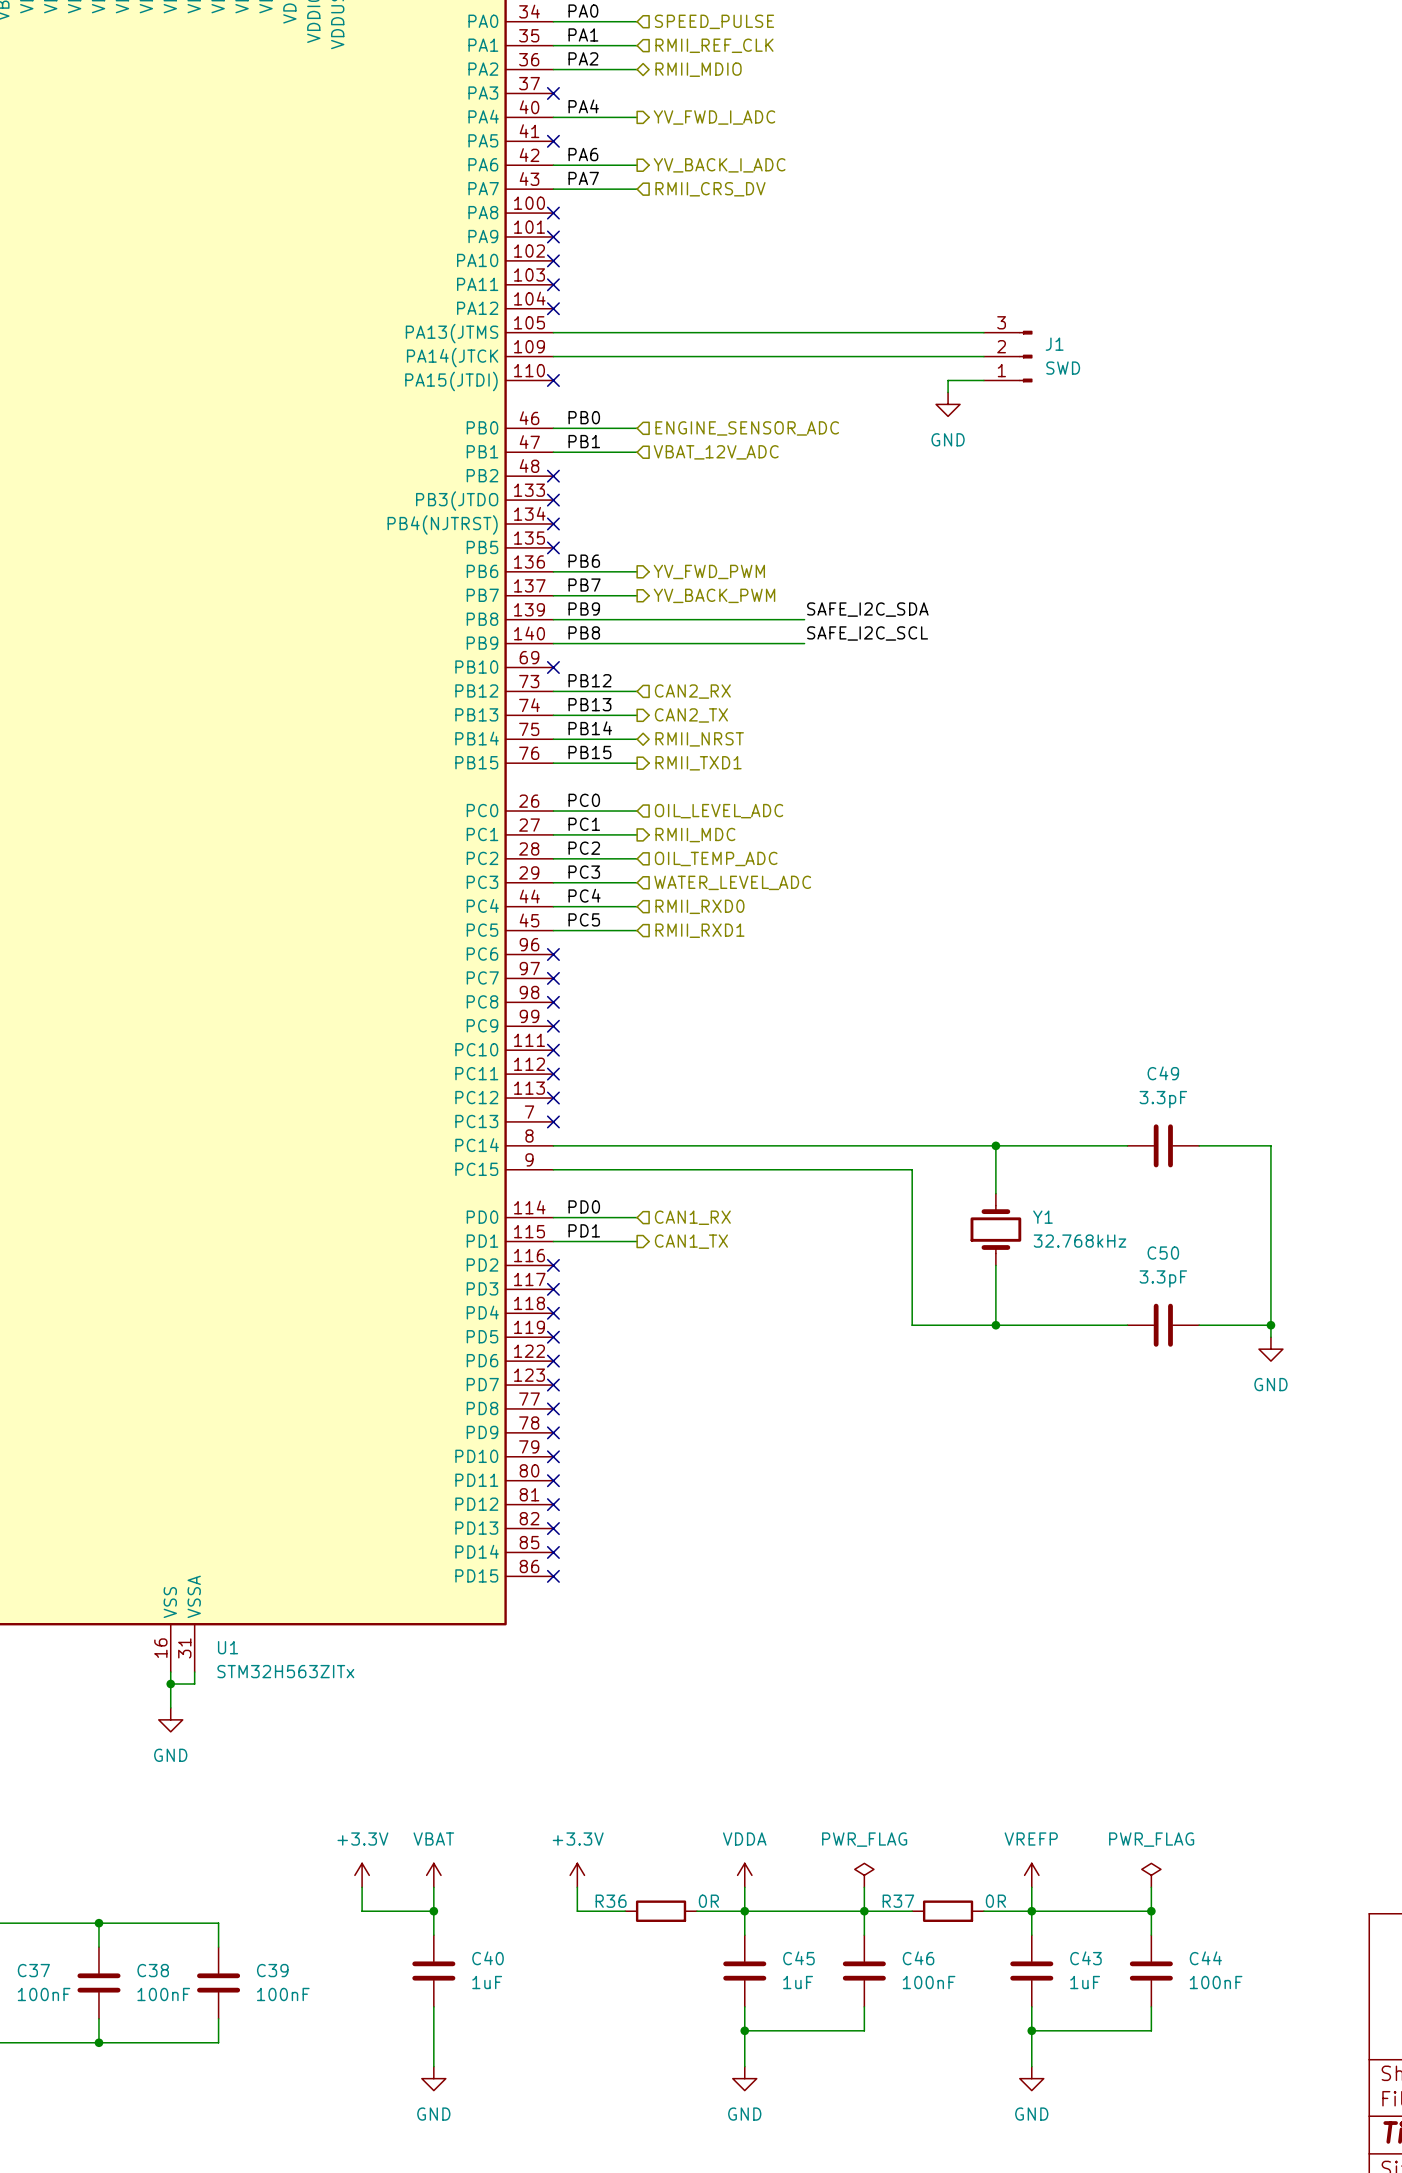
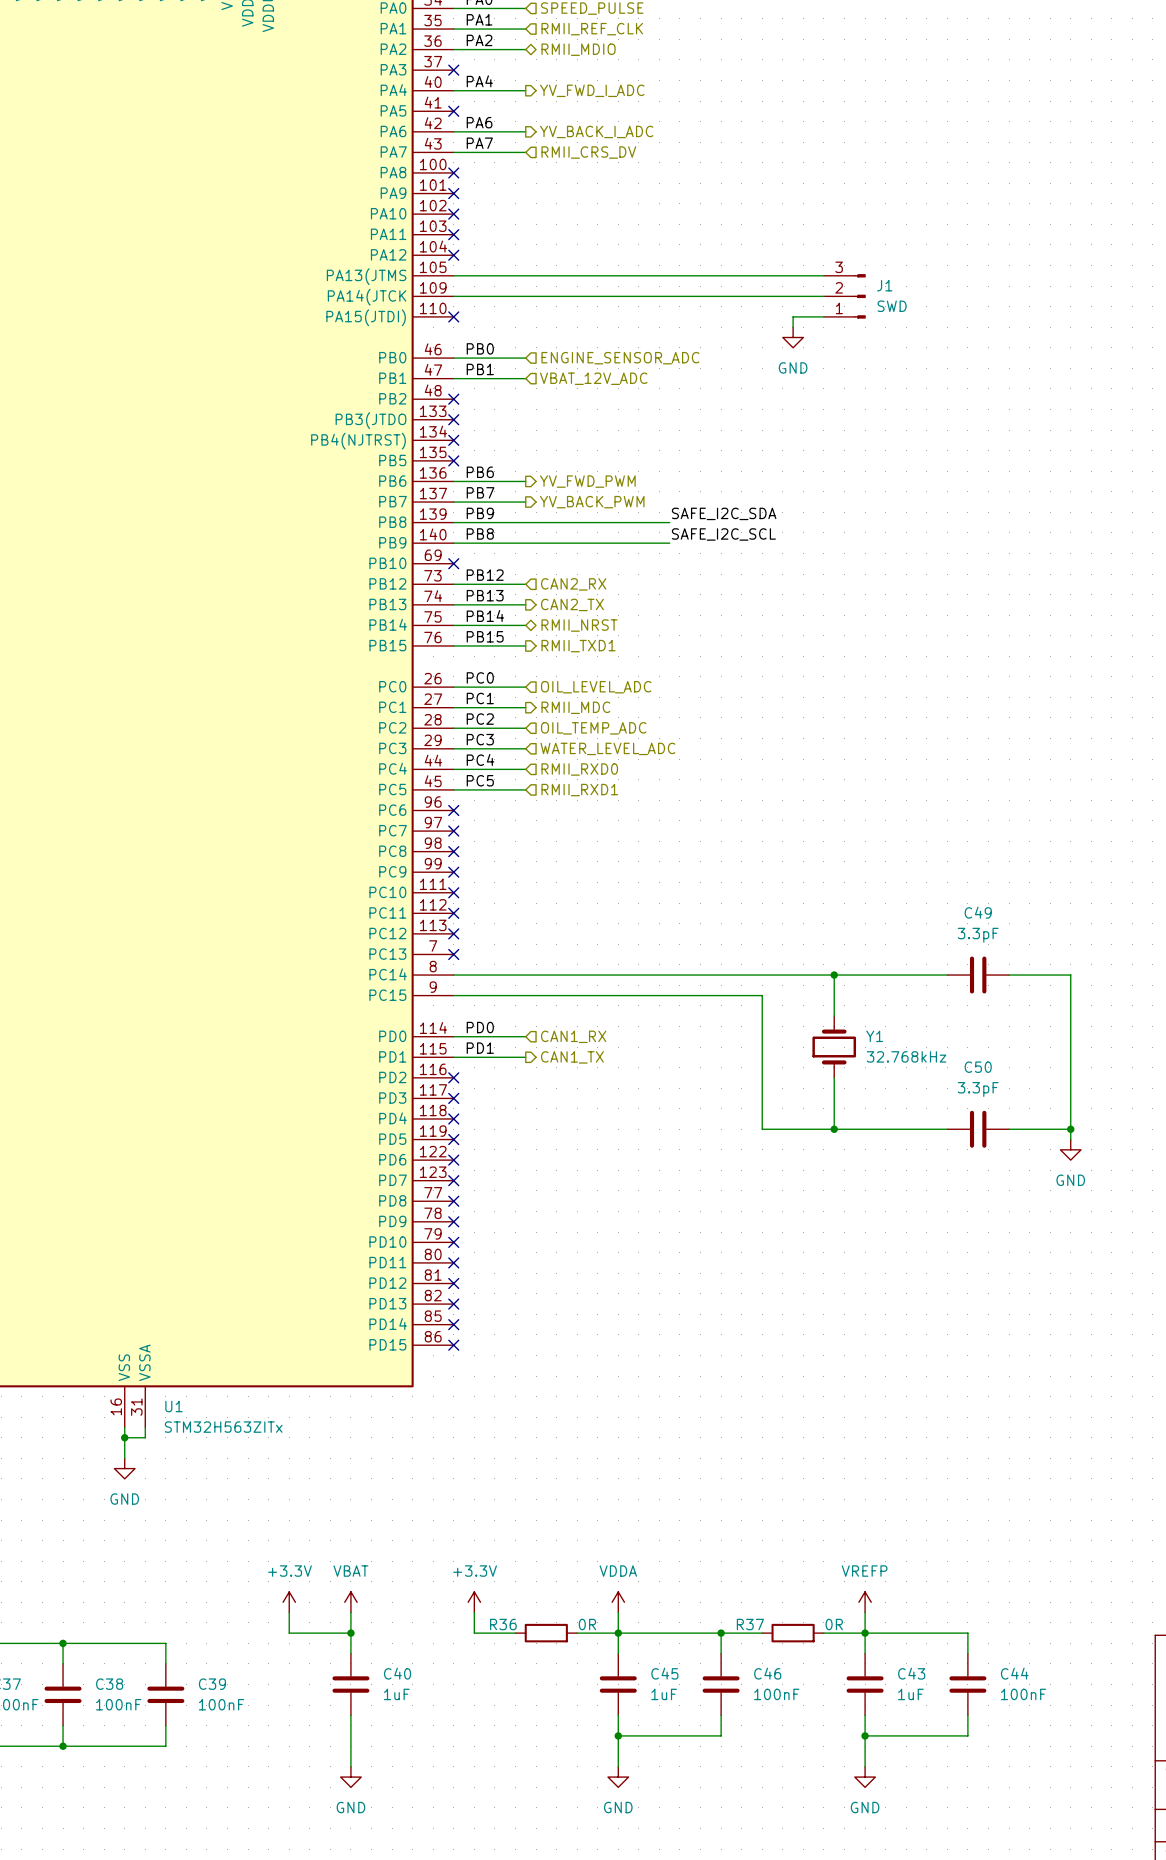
power symbol: PWR_FLAG (864, 1875) -> none
power symbol: PWR_FLAG (1151, 1875) -> none
wire: (864, 1887) (864, 1911) -> none
wire: (1151, 1887) (1151, 1911) -> none
junction: (1151, 1911) -> none

